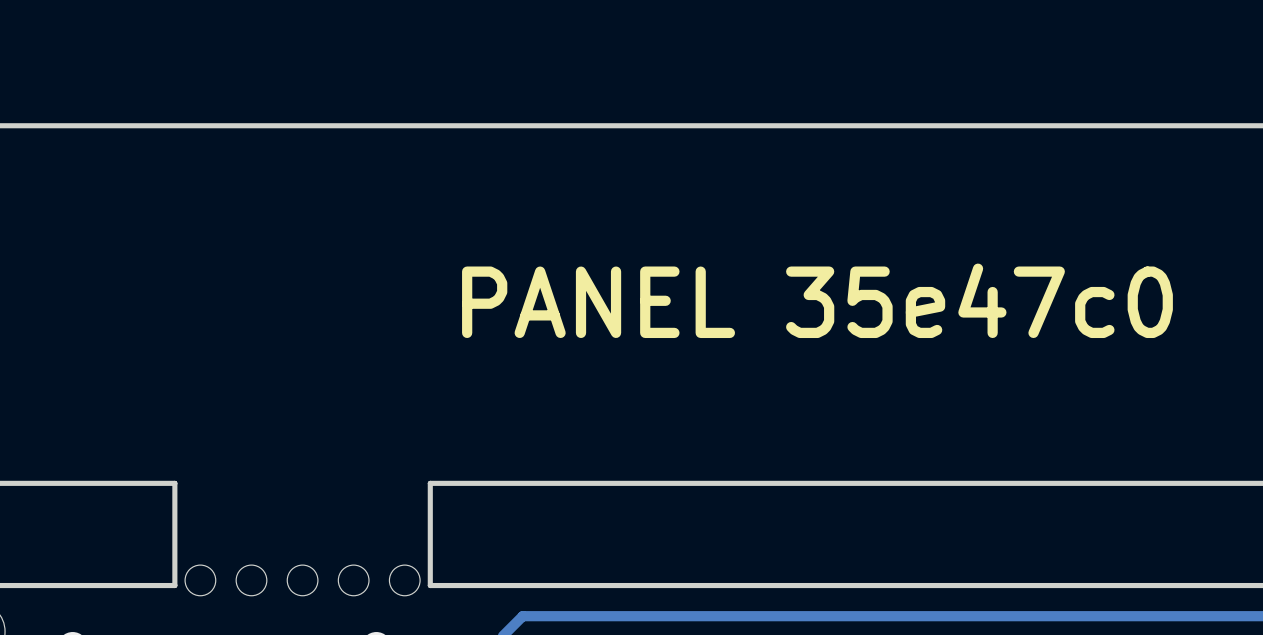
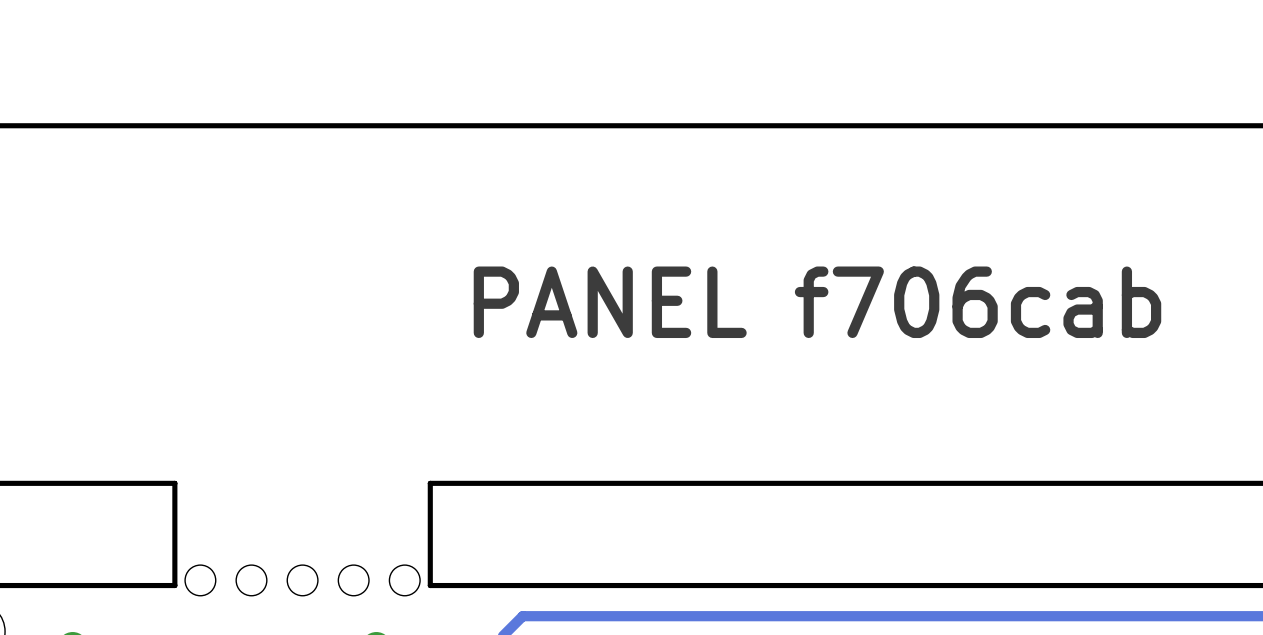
text: PANEL 35e47c0 (817, 300) -> PANEL f706cab (817, 302)

